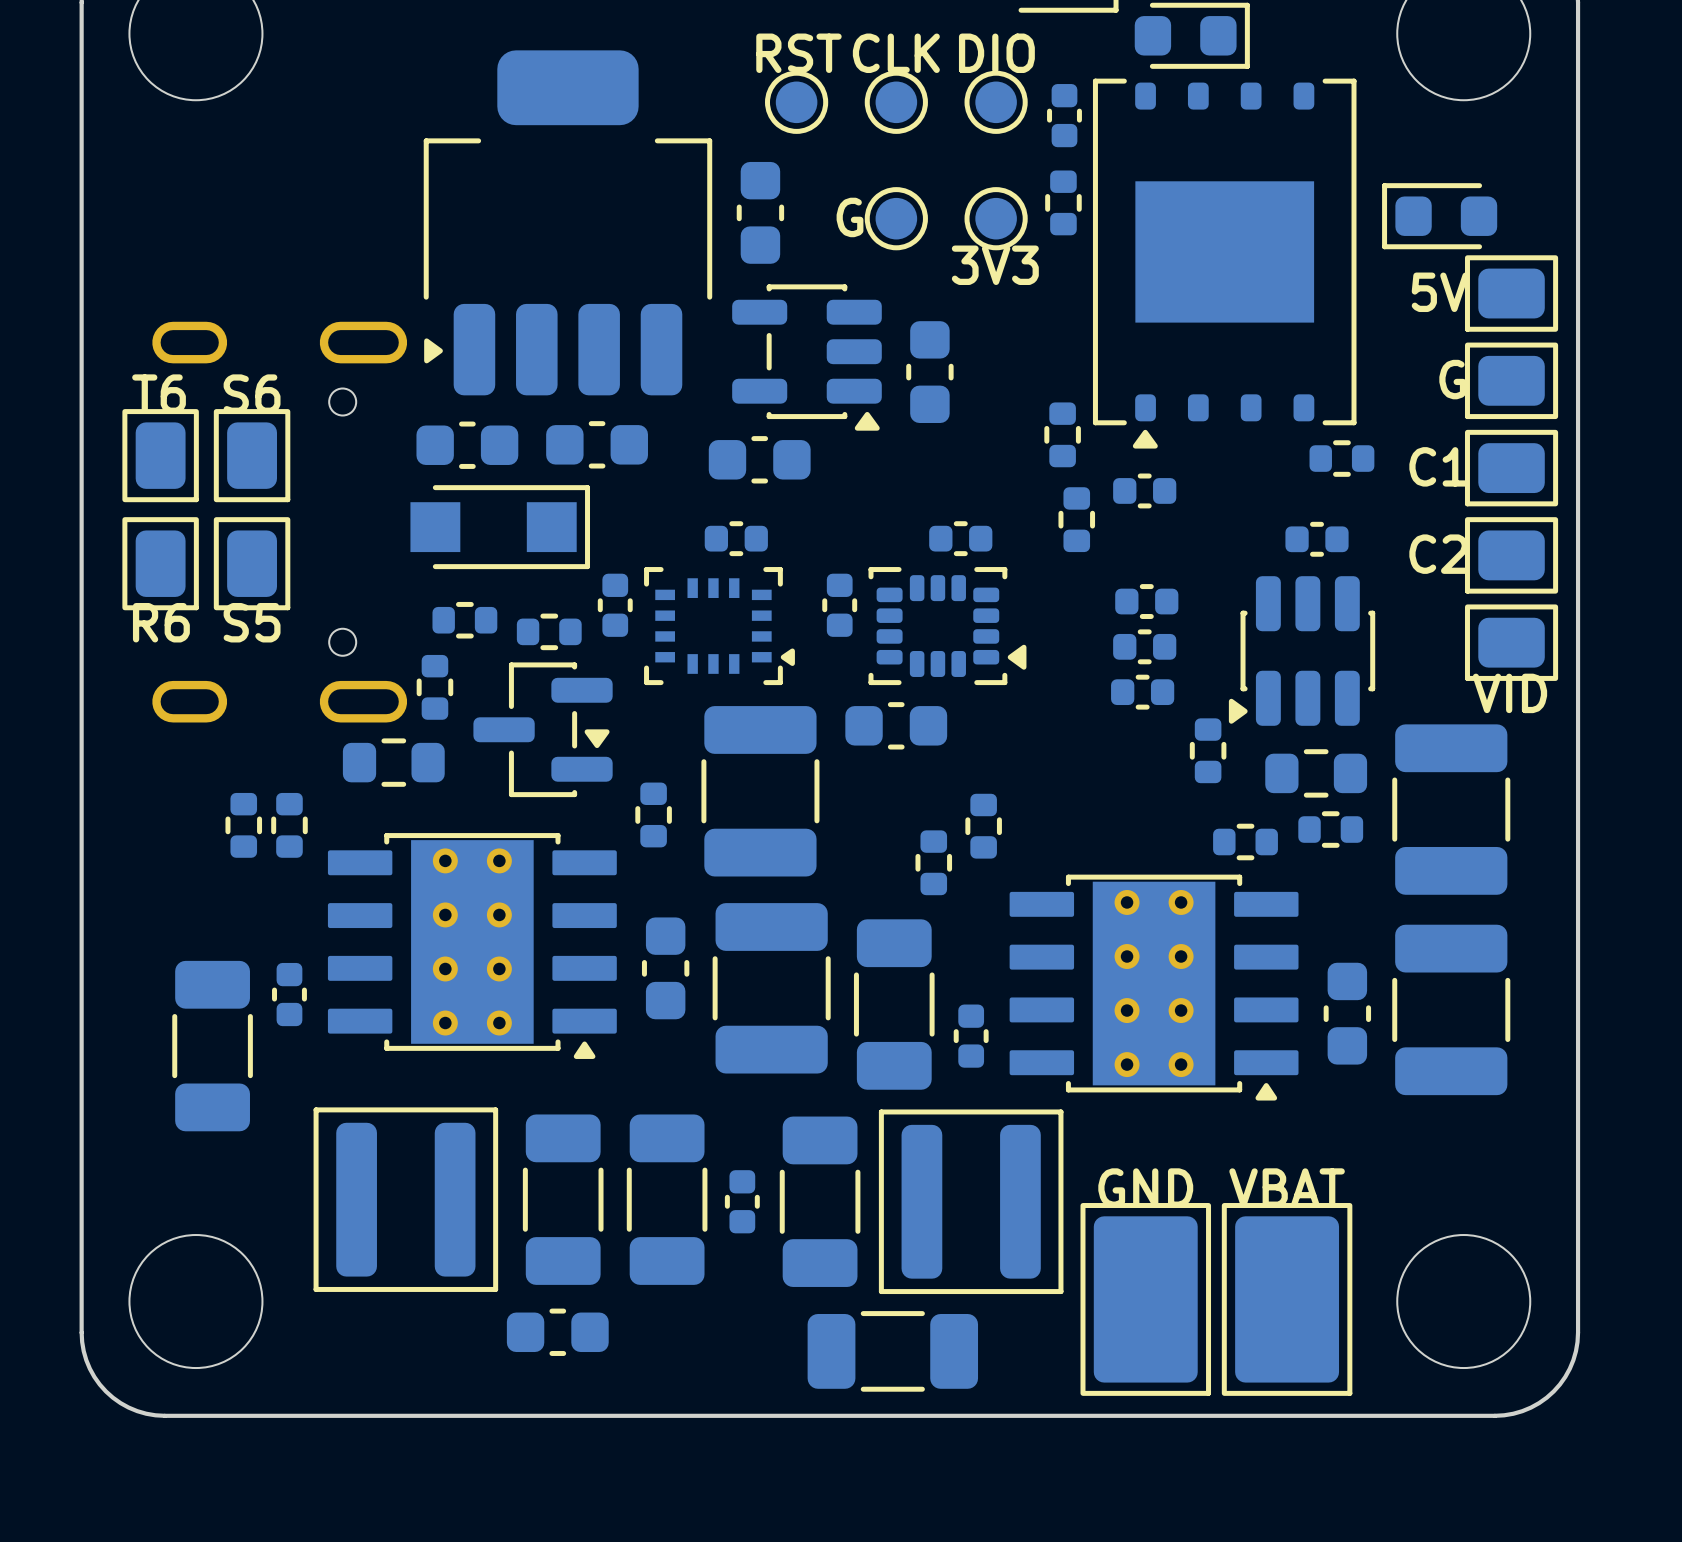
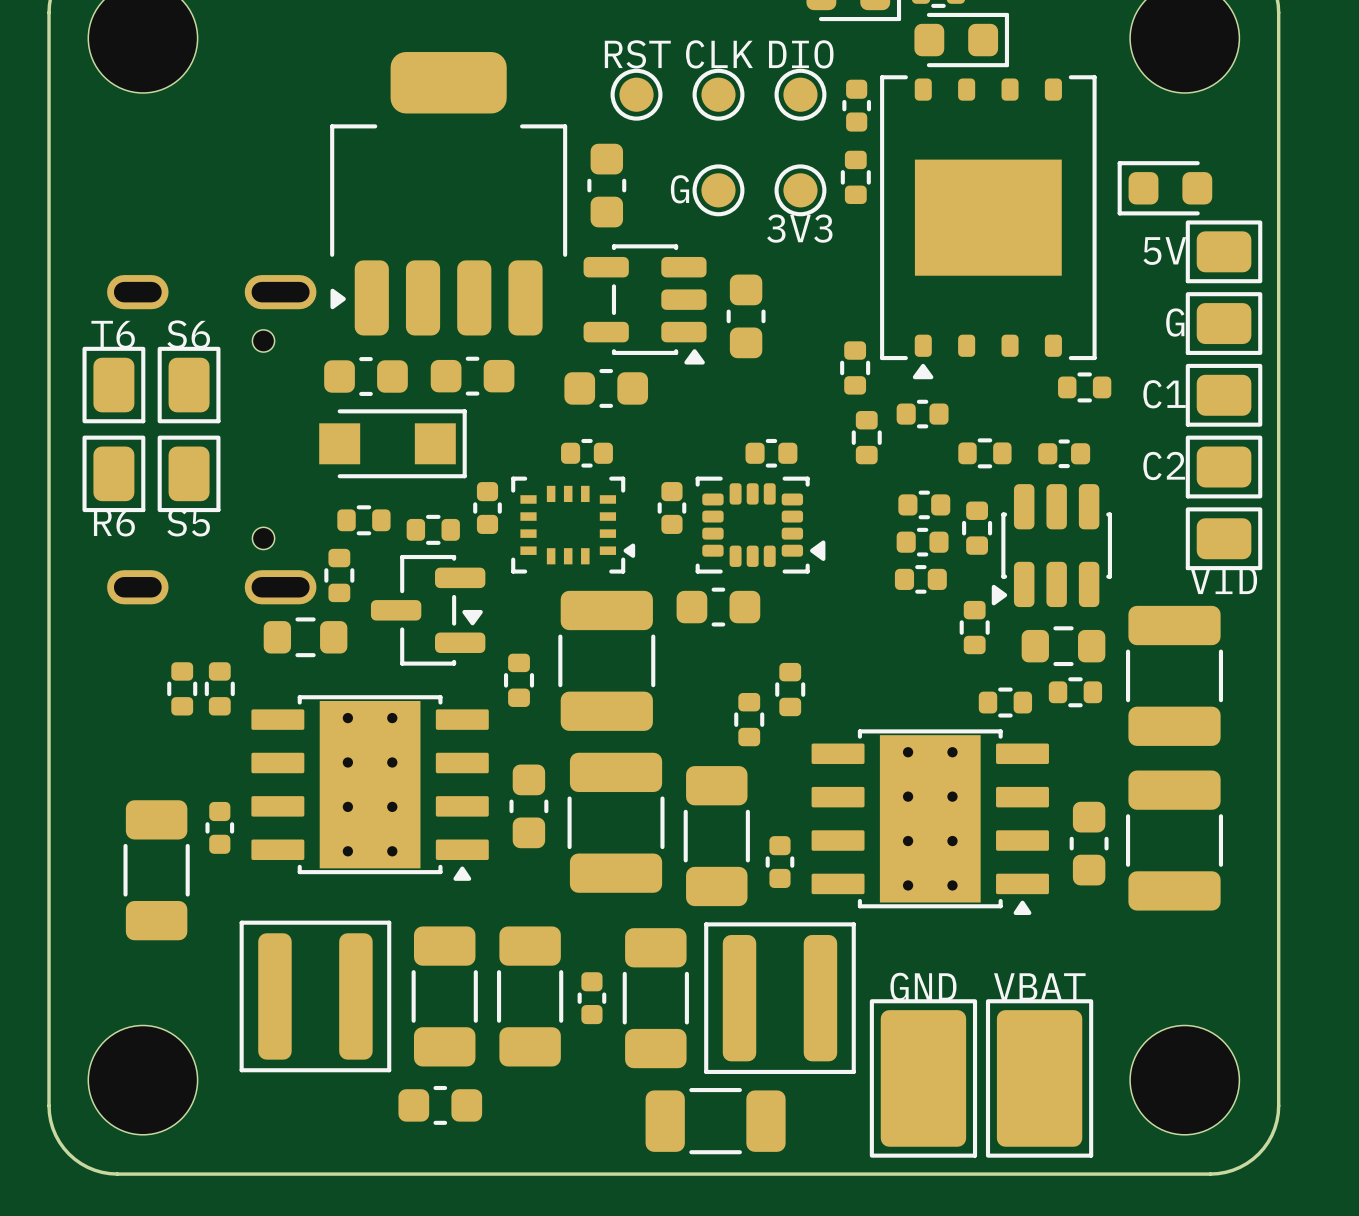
part: none -> (984, 453)
part: none -> (977, 528)

